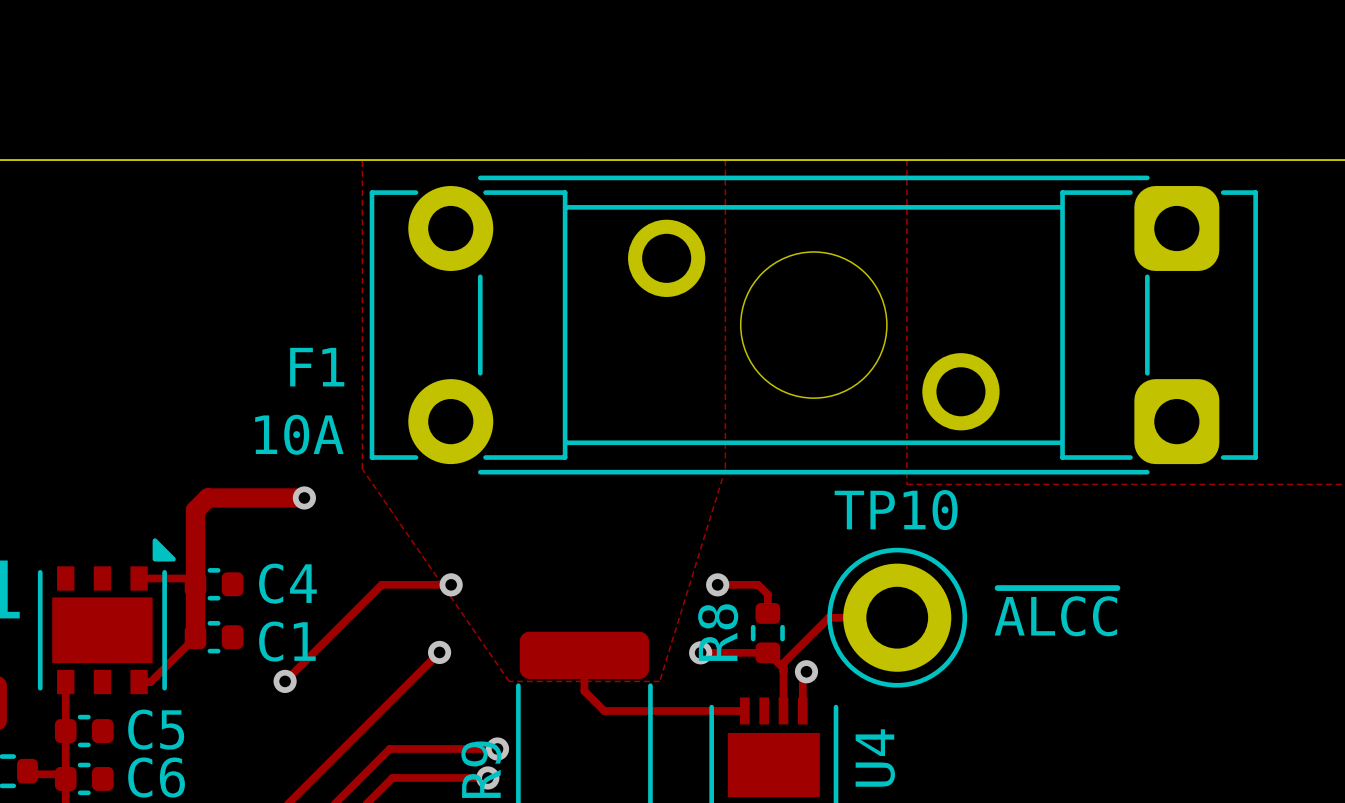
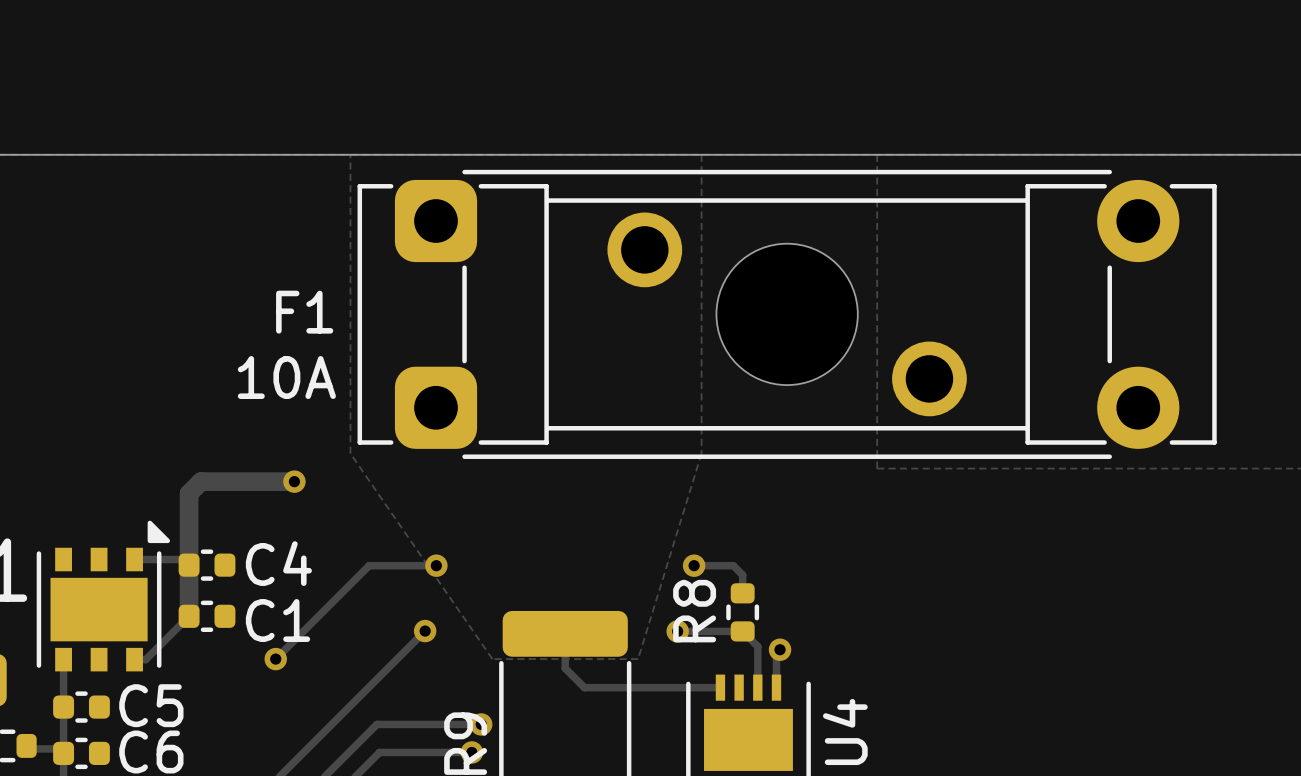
F1 rotation: 0° (813, 325) -> 180° (787, 314)
track: (897, 617) (828, 617) (783, 663) (783, 668) -> none
TP10: (897, 617) -> none

